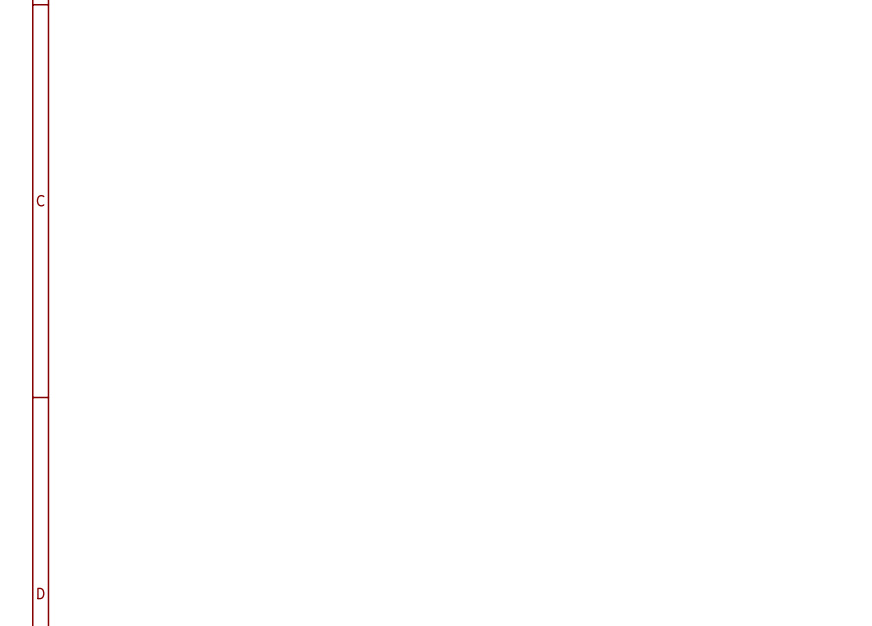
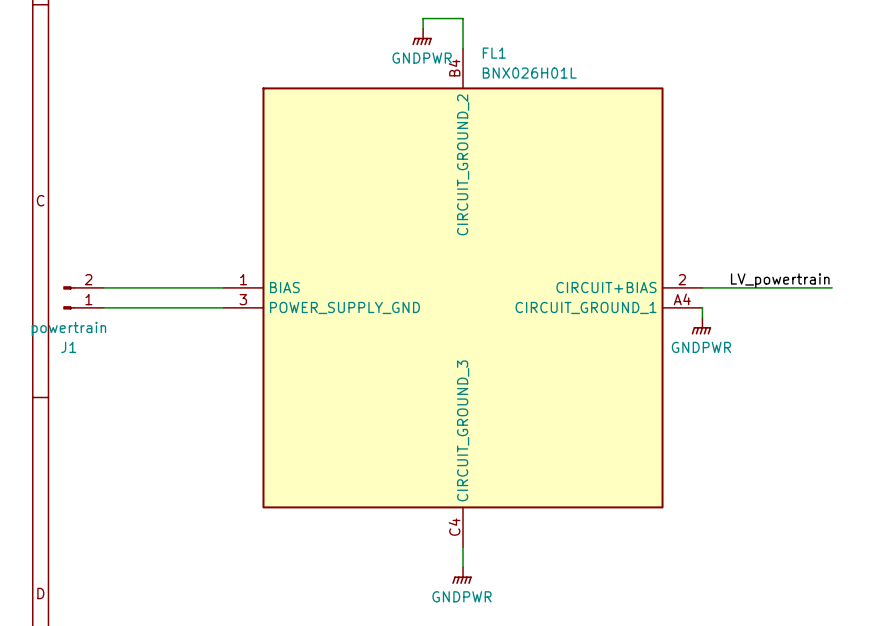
wire: none -> (423, 28) (423, 18) (463, 18) (463, 48)
power symbol: none -> GNDPWR (422, 36)
label: none -> LV_powertrain (780, 280)
wire: none -> (103, 287) (223, 287)
wire: none -> (702, 287) (832, 287)
J1: none -> powertrain (83, 297)
FL1: none -> BNX026H01L (463, 297)
wire: none -> (103, 307) (223, 307)
wire: none -> (702, 307) (702, 317)
power symbol: none -> GNDPWR (701, 326)
wire: none -> (463, 547) (463, 567)
power symbol: none -> GNDPWR (462, 575)

